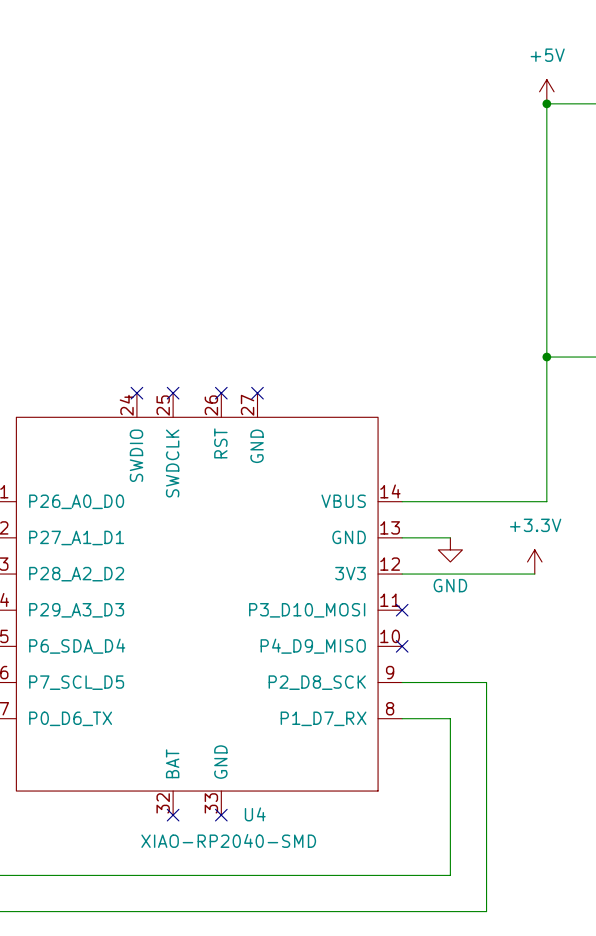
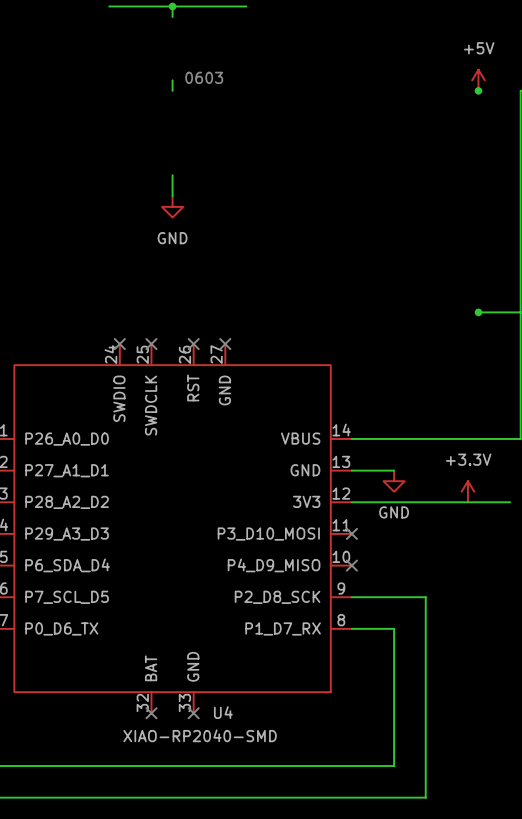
wire: none -> (109, 6) (246, 6)
wire: none -> (172, 6) (172, 17)
junction: none -> (172, 6)
text: none -> 0603 (204, 77)
wire: none -> (172, 80) (172, 90)
wire: (595, 103) (546, 103) (546, 501) -> (520, 90) (520, 438) (478, 438)
wire: none -> (172, 175) (172, 196)
power symbol: none -> GND (172, 206)
wire: none -> (467, 502) (510, 502)

